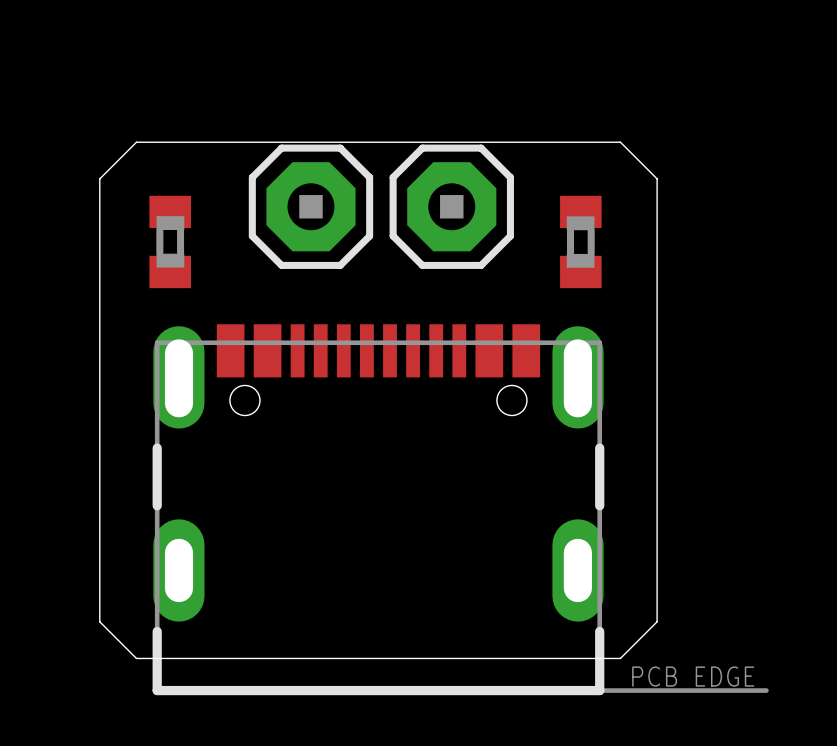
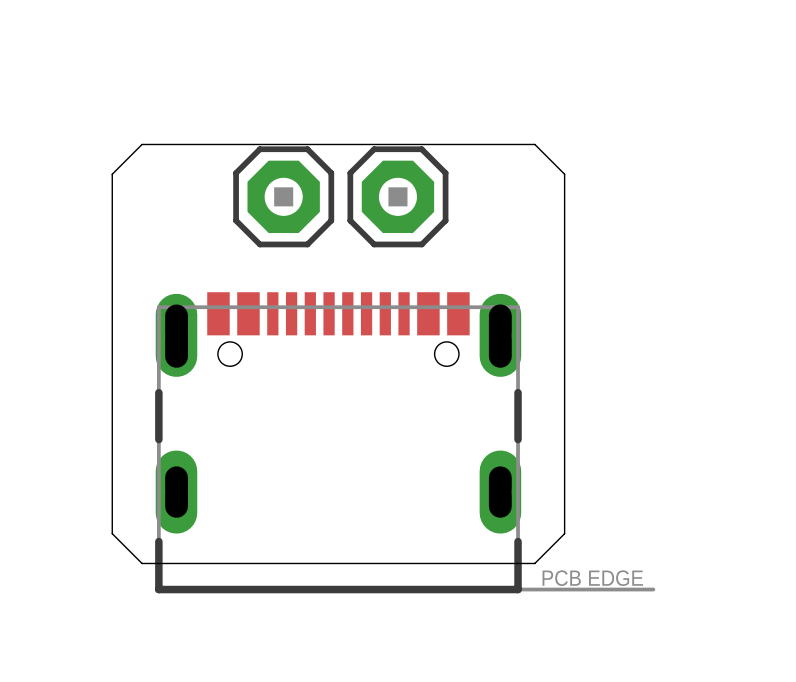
part: (170, 241) -> none
part: (580, 241) -> none

